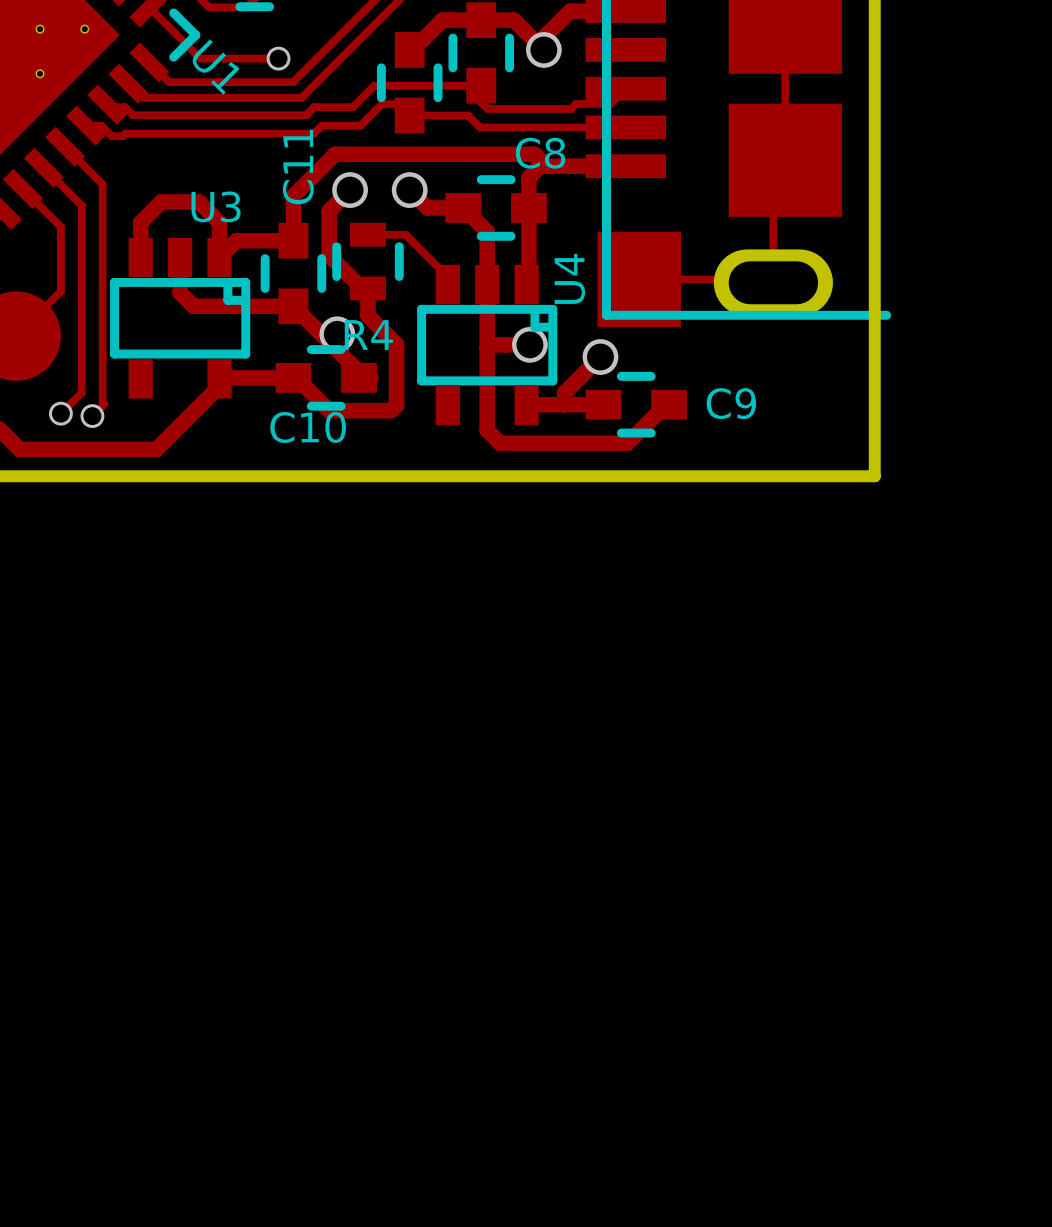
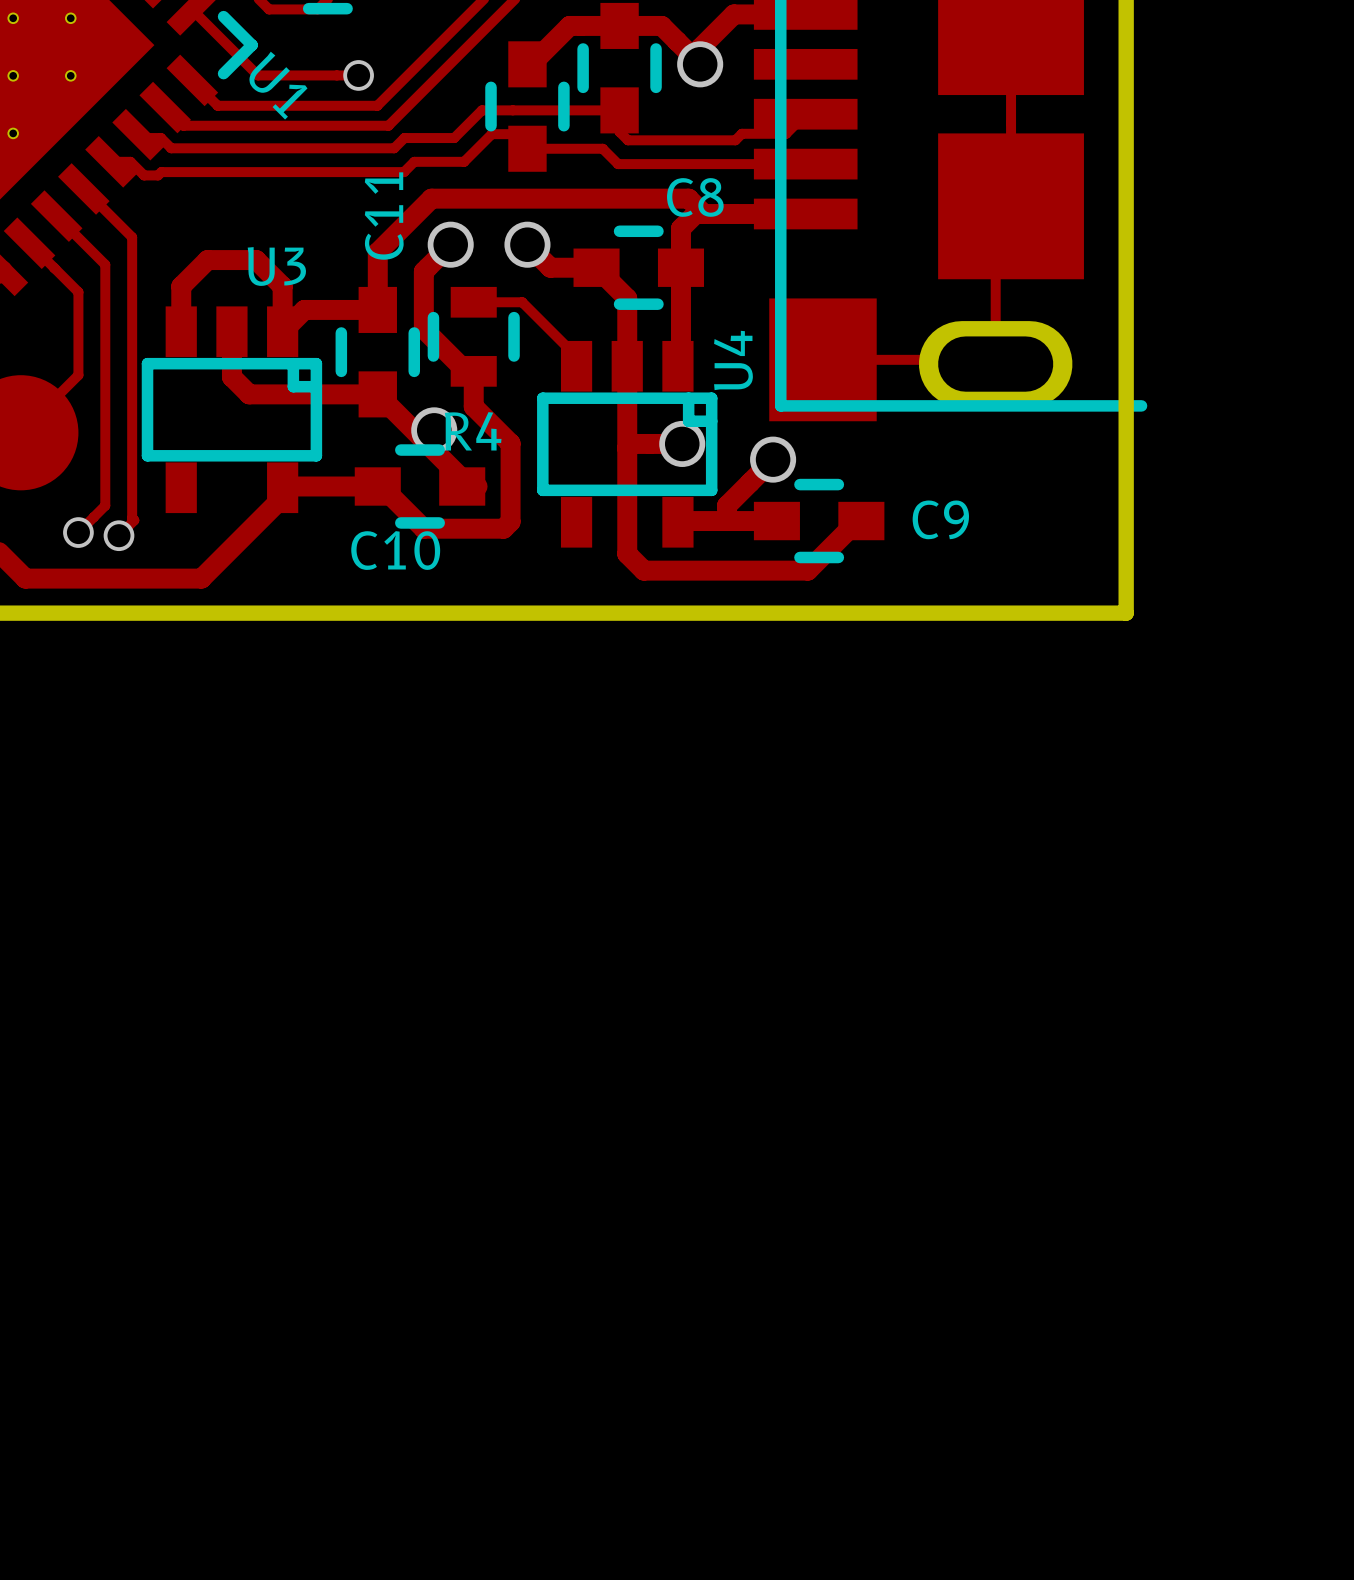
part: none -> (13, 18)
part: none -> (70, 18)
part: (40, 29) -> none
part: (84, 29) -> none
part: none -> (13, 75)
part: none -> (70, 75)
part: (40, 73) -> none
part: none -> (13, 133)

